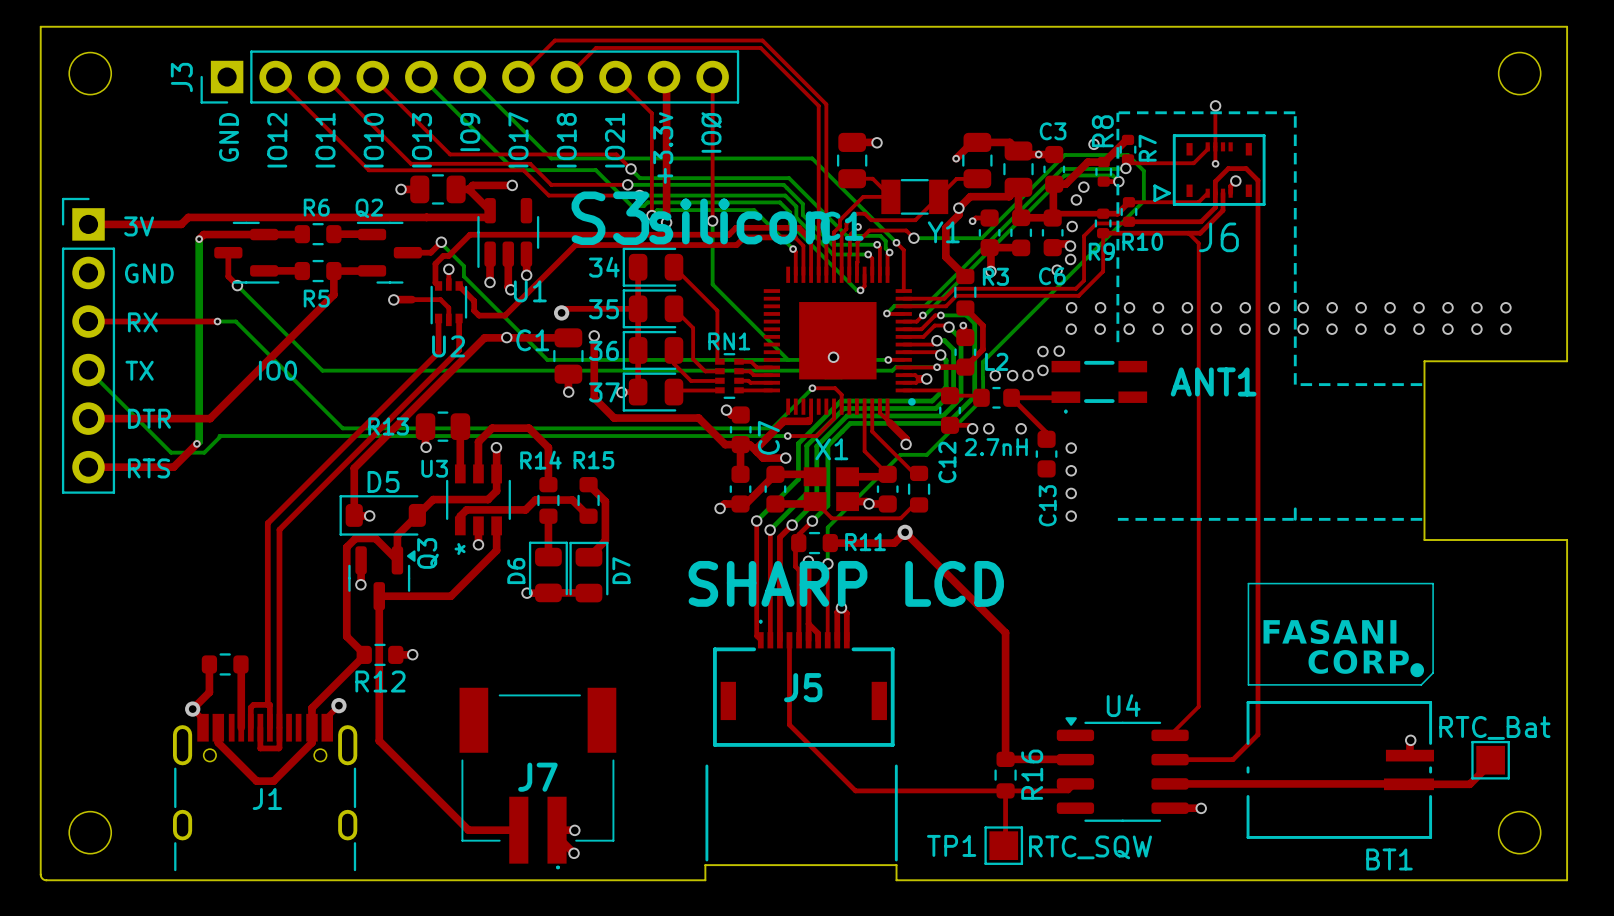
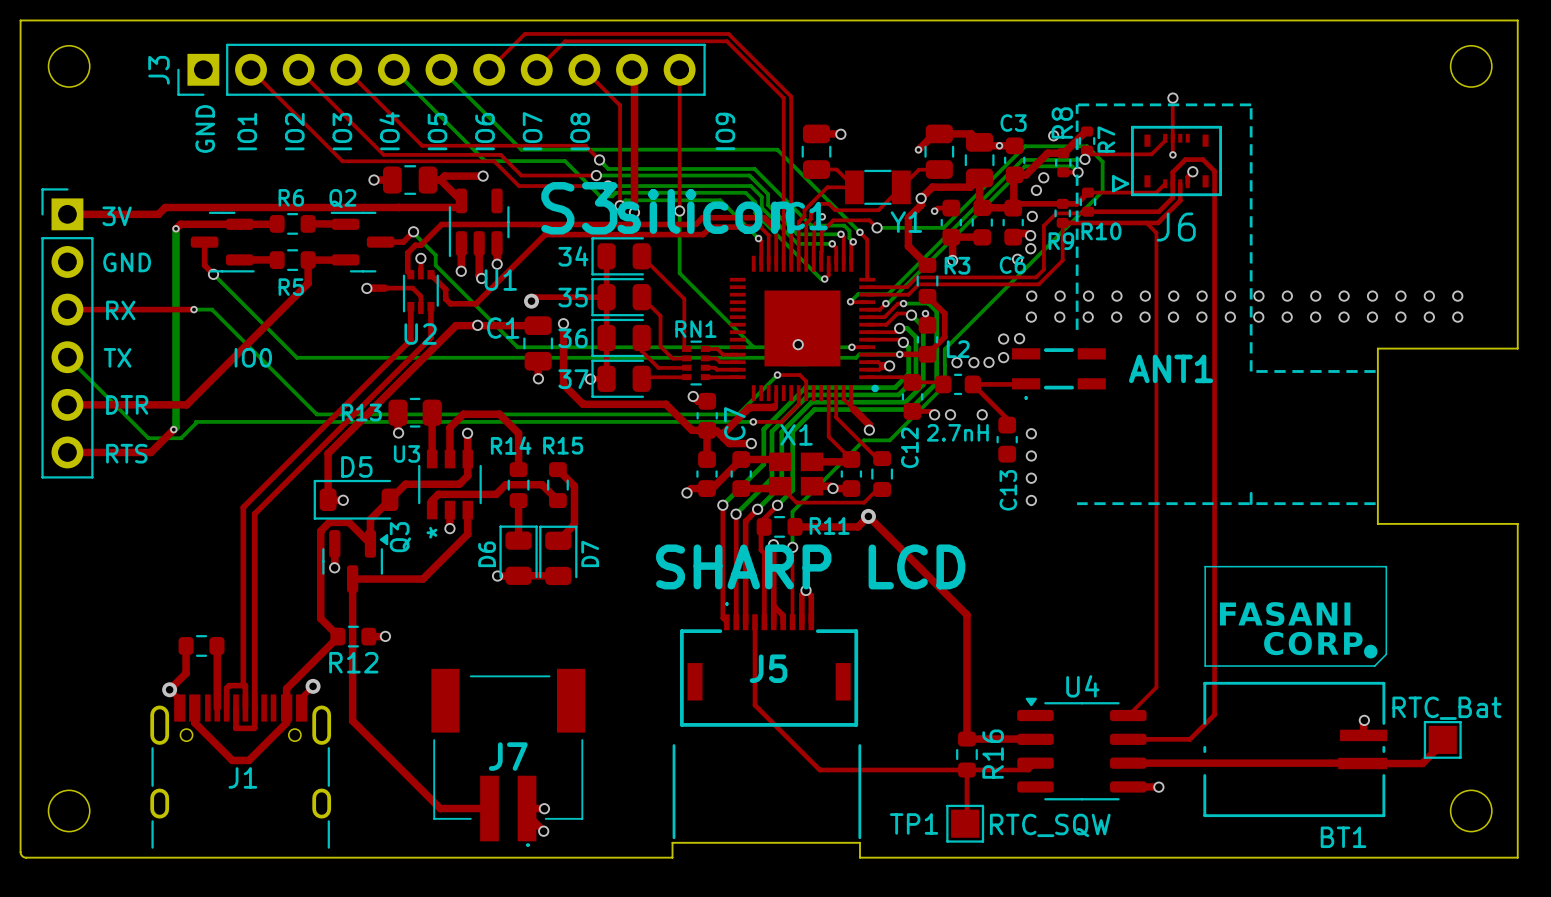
text: IO9 (470, 132) -> IO5 (437, 131)
text: IOØ (711, 132) -> none
text: IO17 (518, 139) -> IO6 (485, 131)
text: none -> IO9 (725, 131)
text: IO12 (277, 140) -> IO1 (247, 131)
text: IO11 (325, 140) -> IO2 (294, 131)
text: IO10 (373, 140) -> IO3 (342, 131)
text: IO13 (422, 140) -> IO4 (389, 131)
text: IO18 (566, 140) -> IO7 (532, 131)
text: IO21 (614, 140) -> IO8 (580, 131)
text: +3.3v (663, 148) -> none

